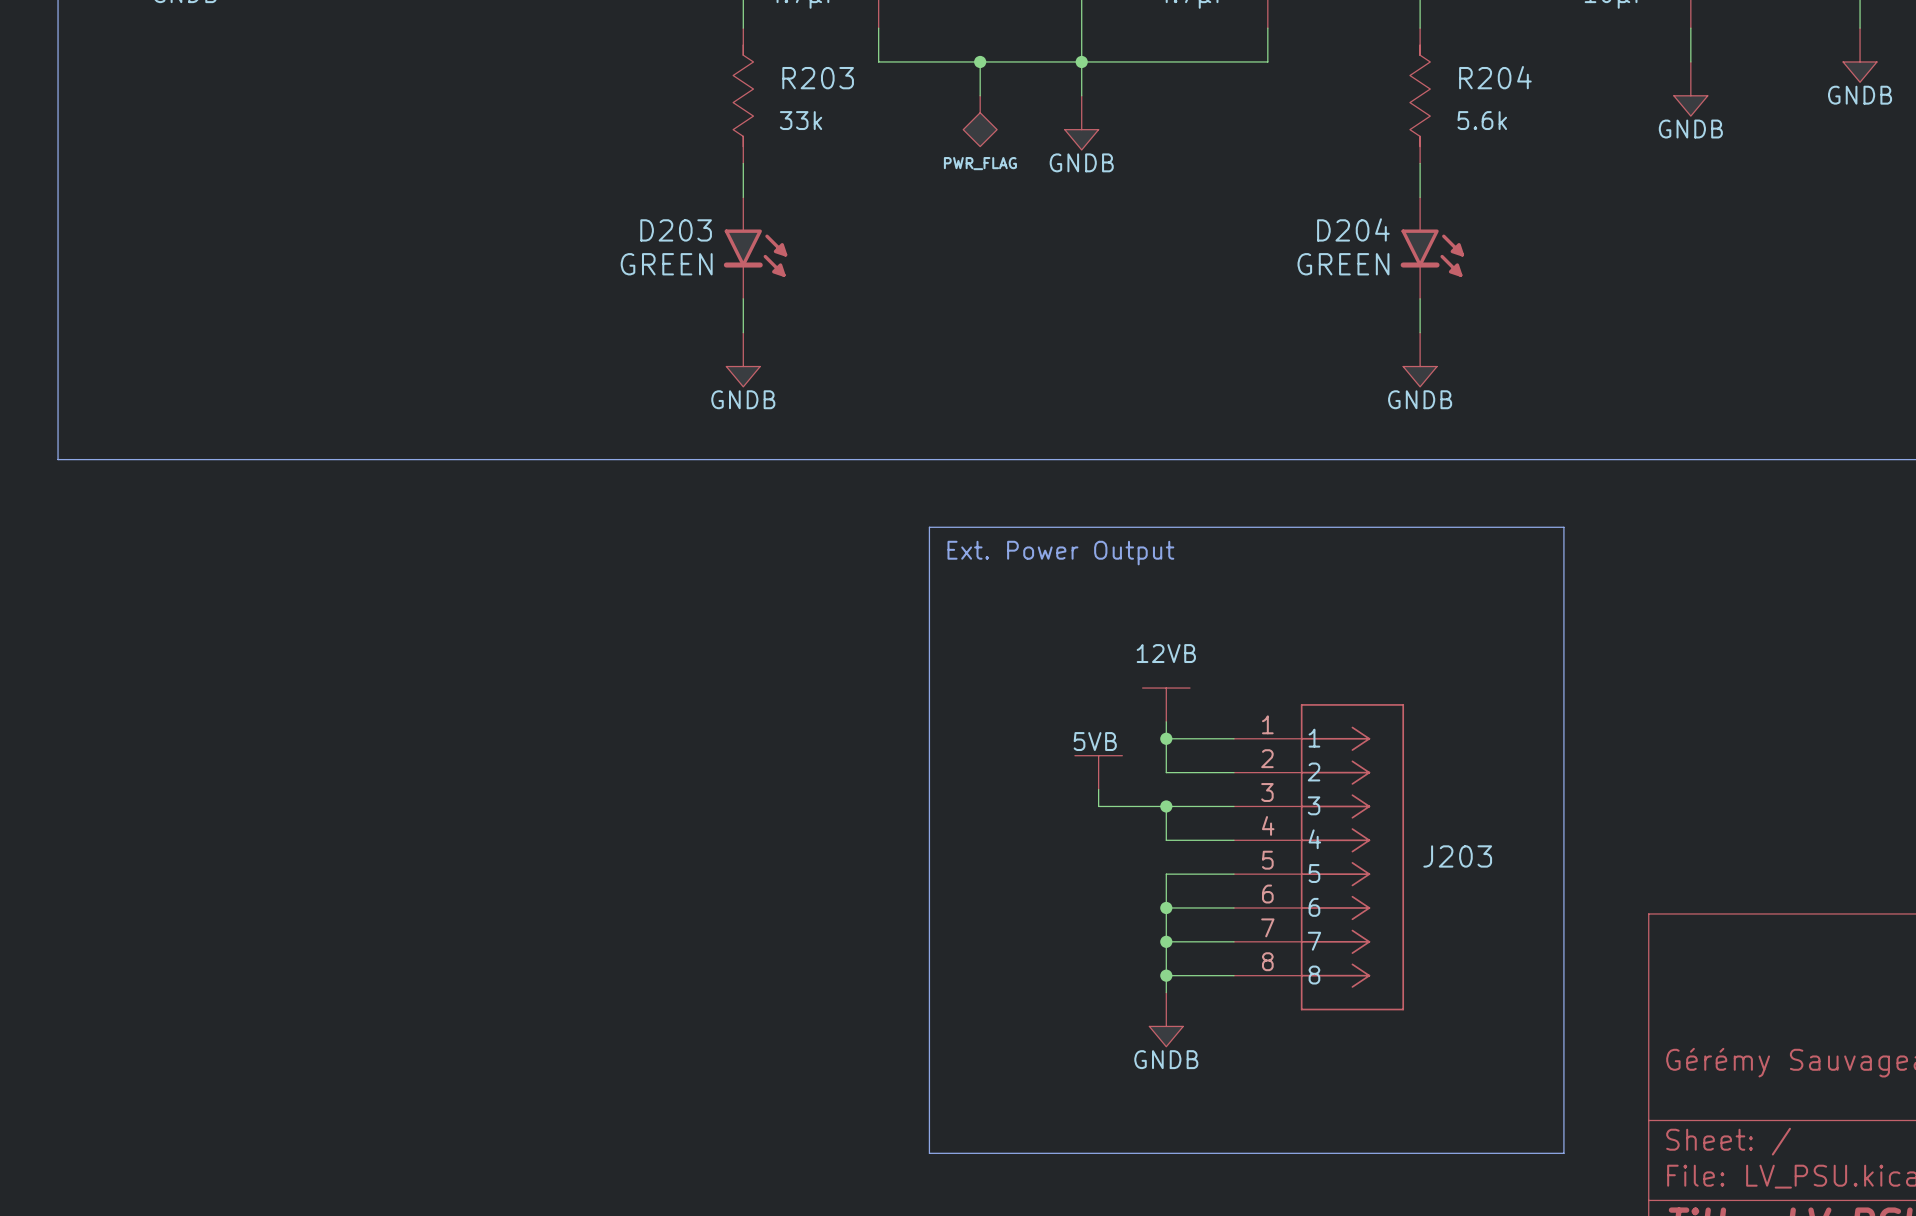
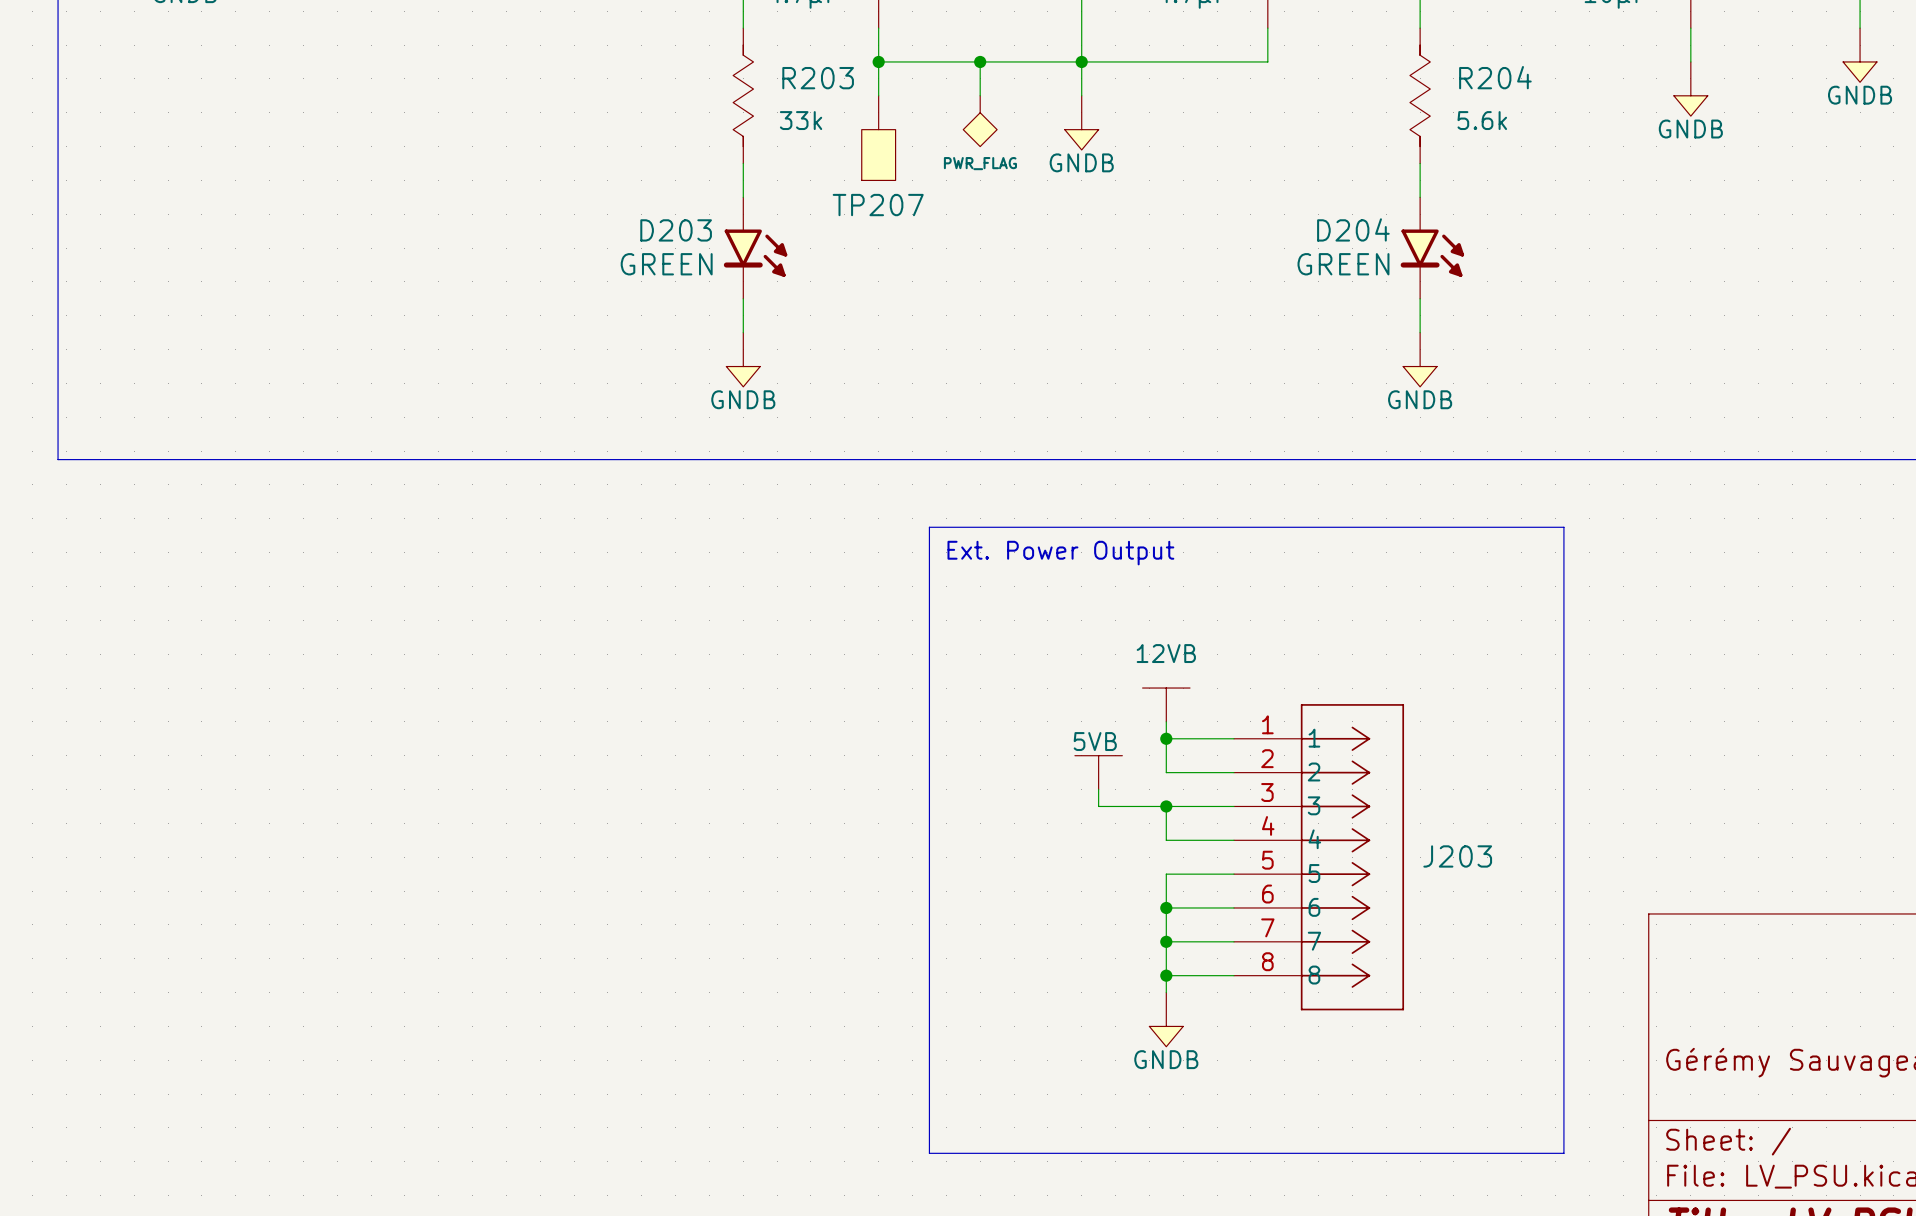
wire: none -> (878, 61) (878, 95)
junction: none -> (878, 61)
TP207: none -> (878, 138)

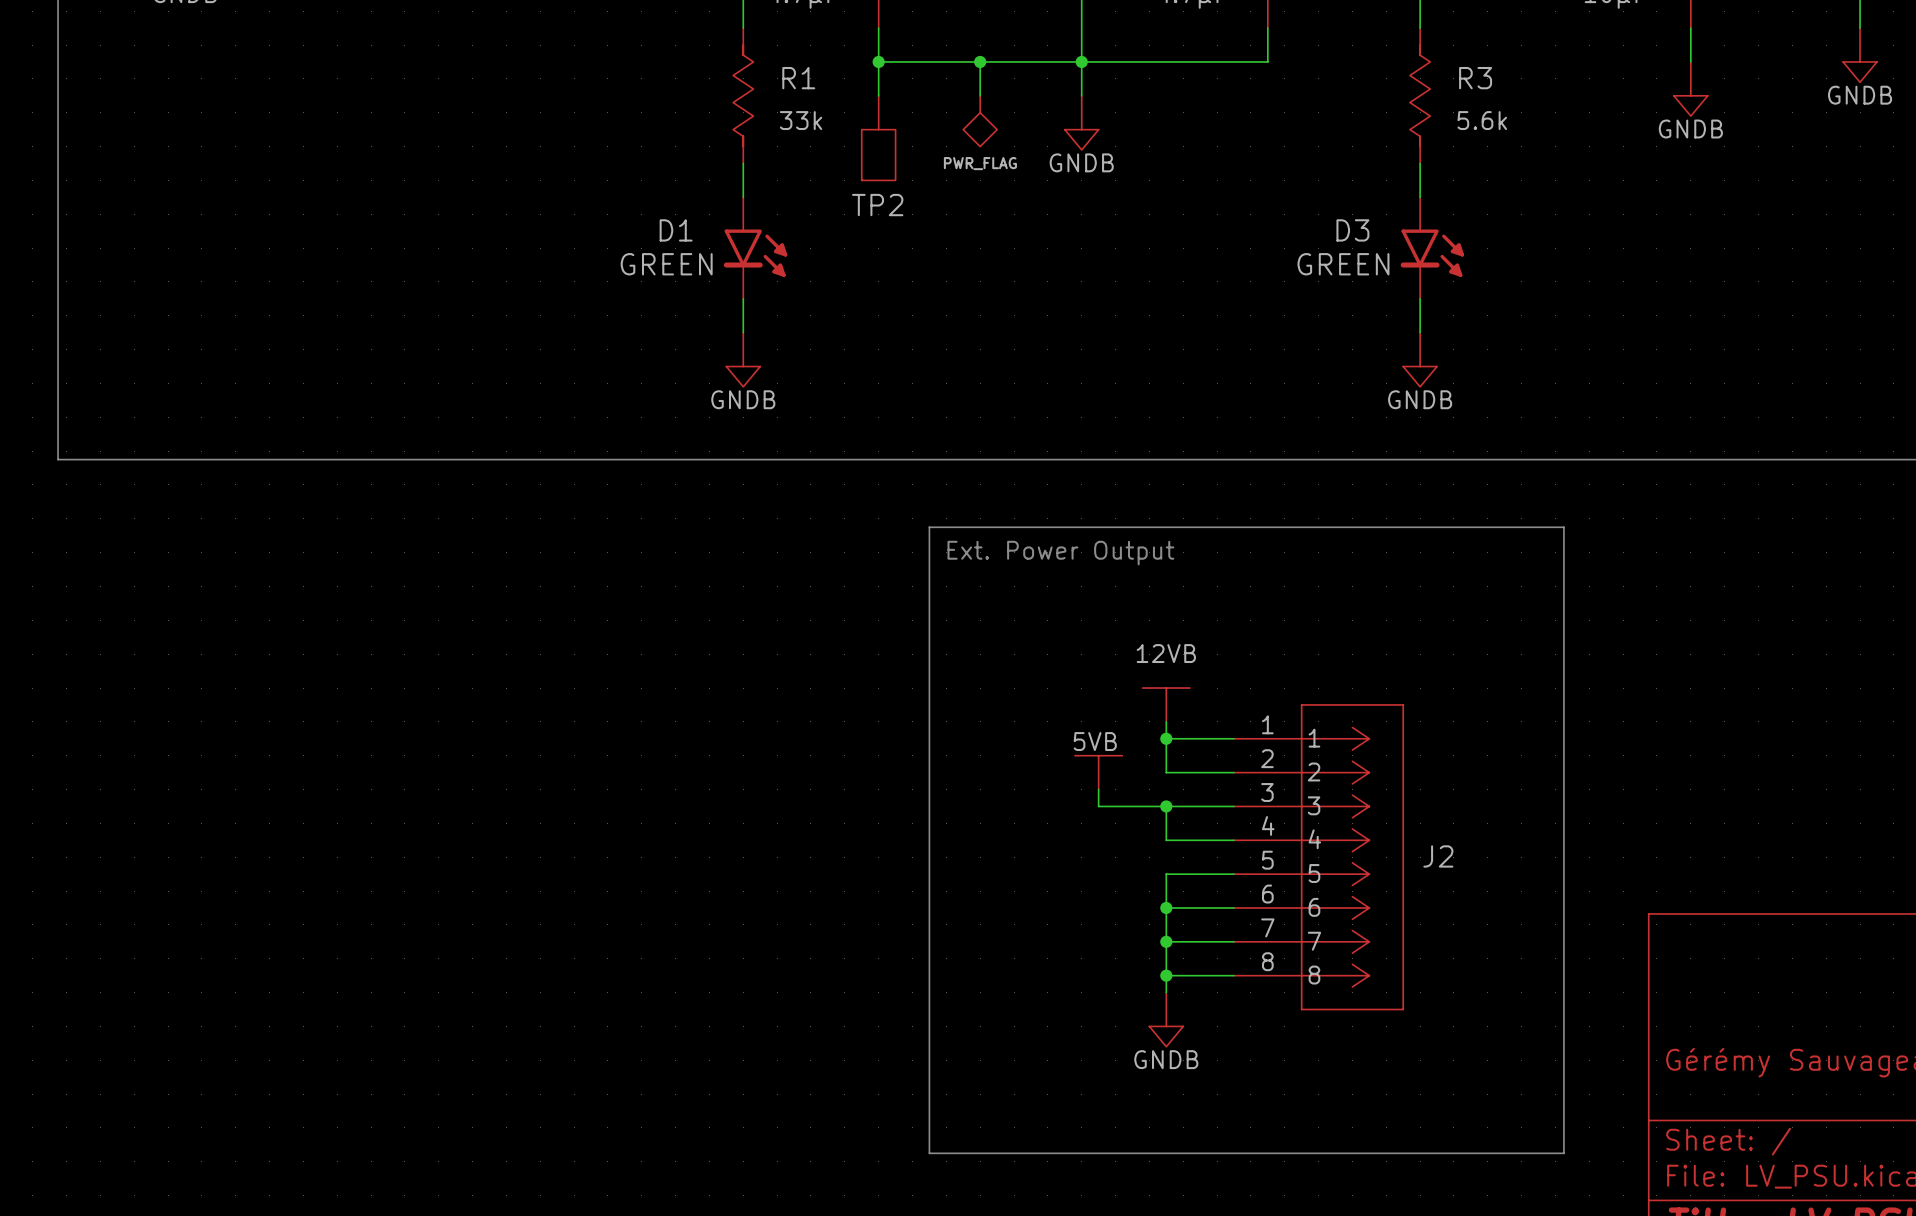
R204 name: R204 (1495, 77) -> R3 (1475, 78)
R203 name: R203 (818, 78) -> R1 (798, 78)
TP207 name: TP207 (878, 205) -> TP2 (877, 205)
D204 name: D204 (1353, 229) -> D3 (1352, 230)
D203 name: D203 (676, 230) -> D1 (676, 230)
J203 name: J203 (1457, 856) -> J2 (1438, 856)

